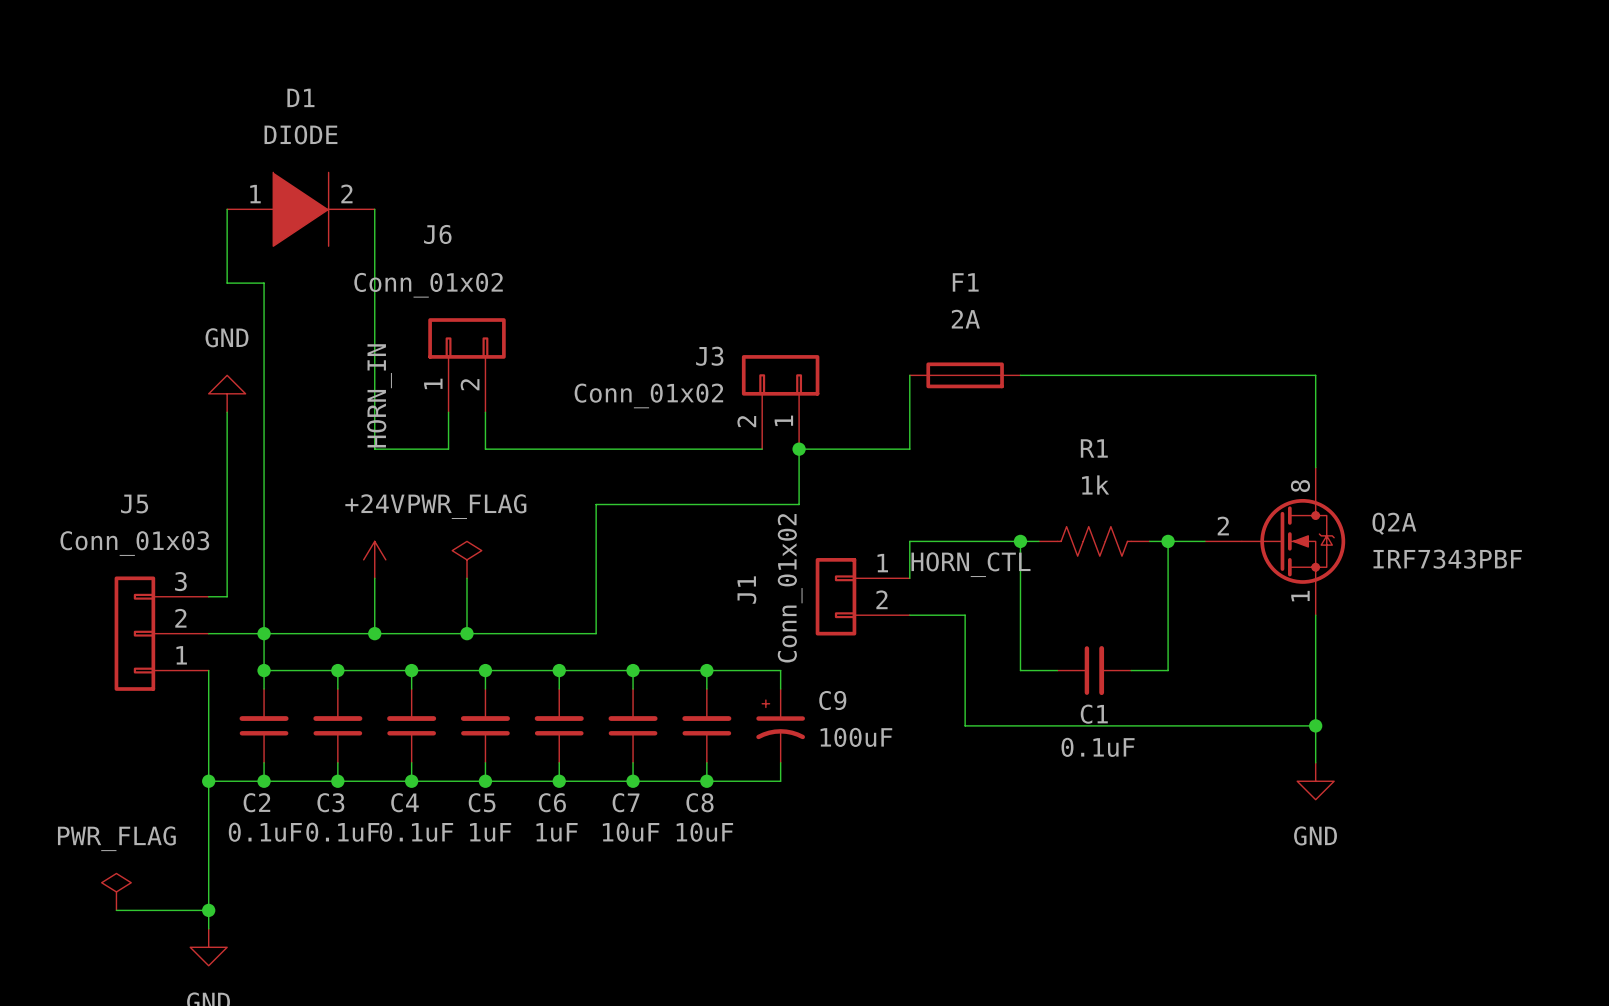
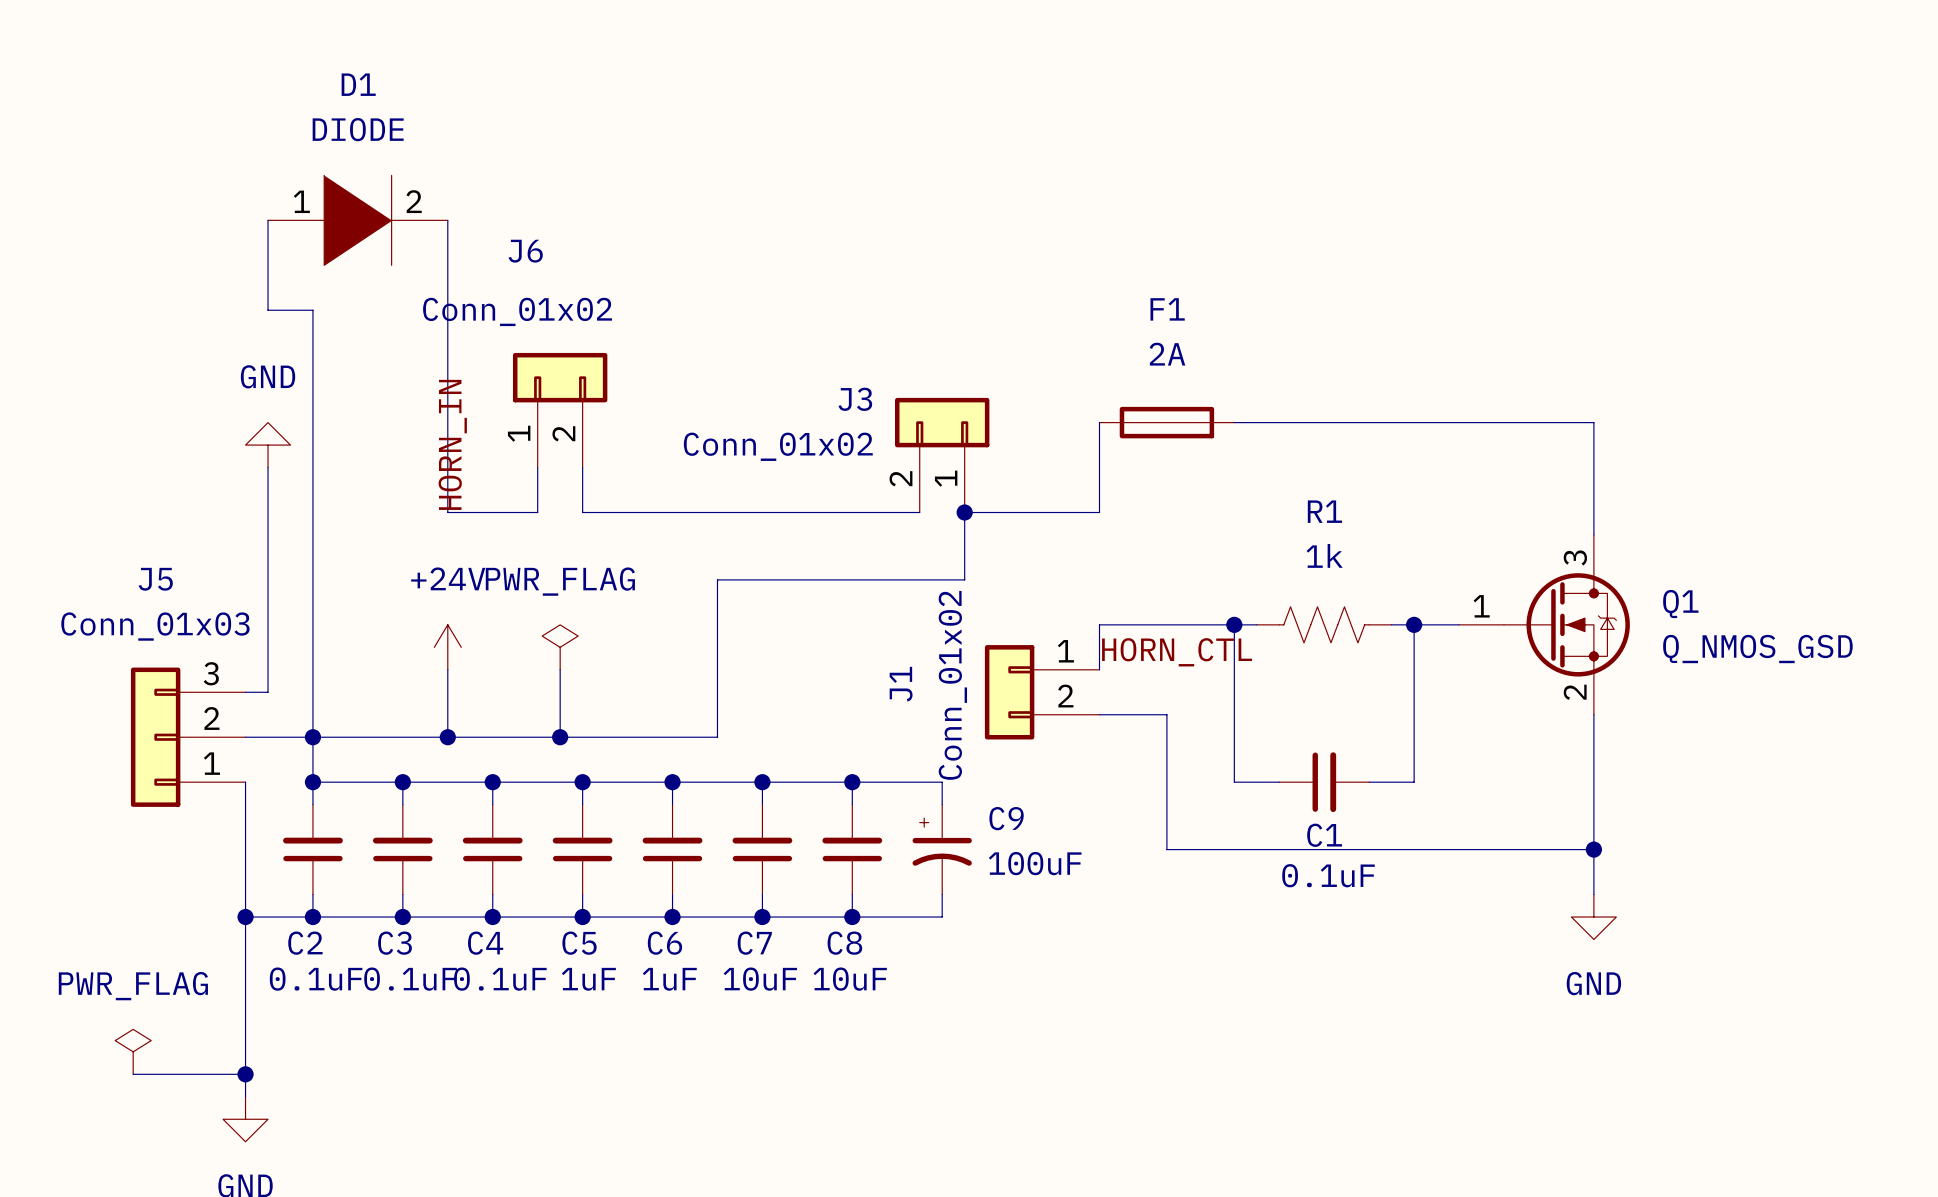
Q2A pin number: 8 (1300, 486) -> 3 (1575, 557)
Q2A name: Q2A (1394, 523) -> Q1 (1680, 604)
Q2A pin number: 2 (1223, 526) -> 1 (1481, 606)
Q2A value: IRF7343PBF (1447, 559) -> Q_NMOS_GSD (1757, 649)
Q2A pin number: 1 (1300, 596) -> 2 (1575, 692)

